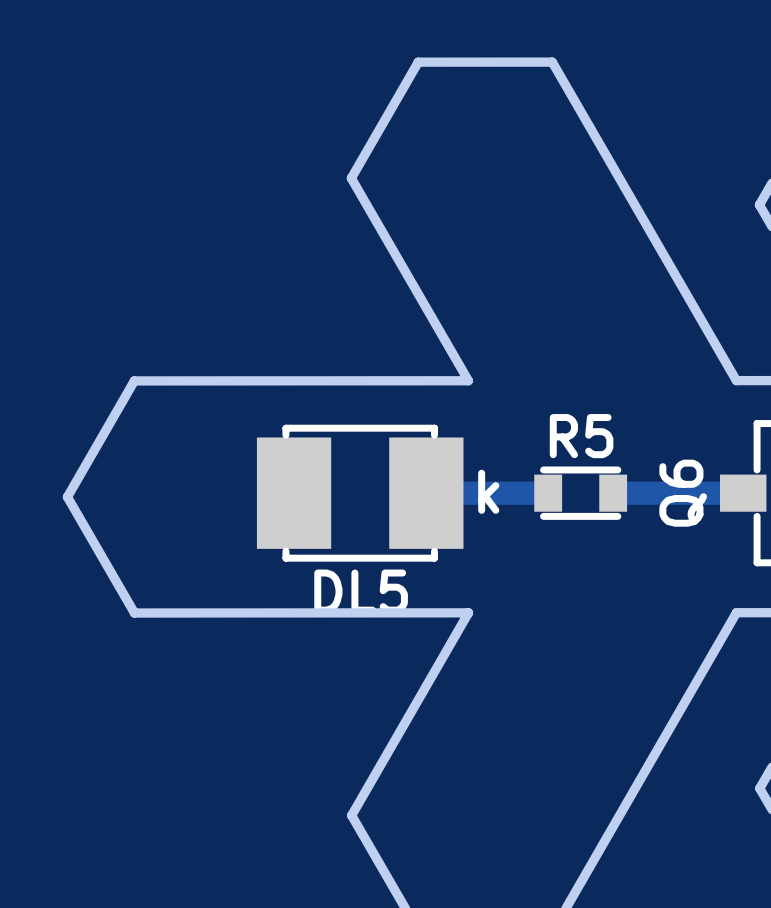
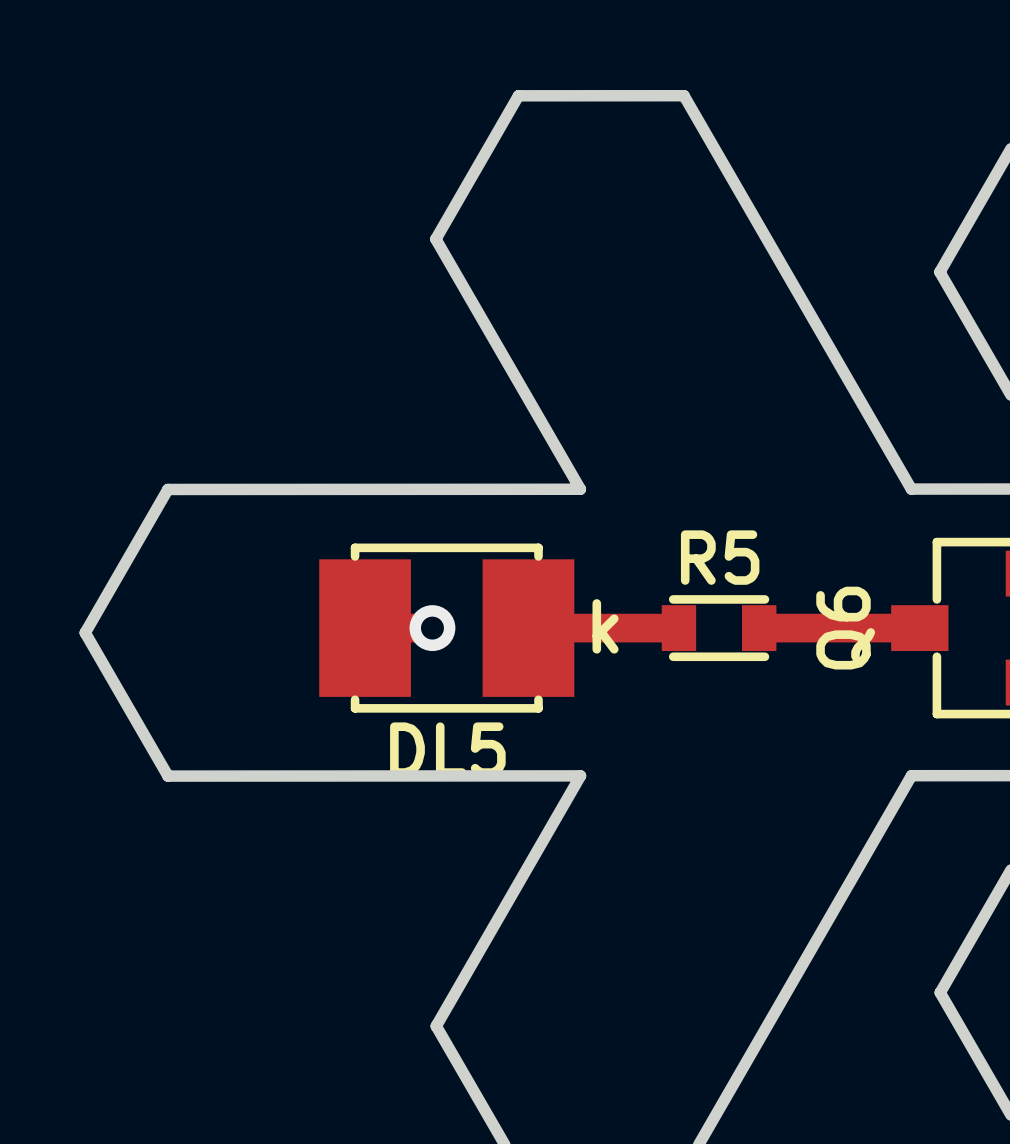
via: none -> (432, 628)

